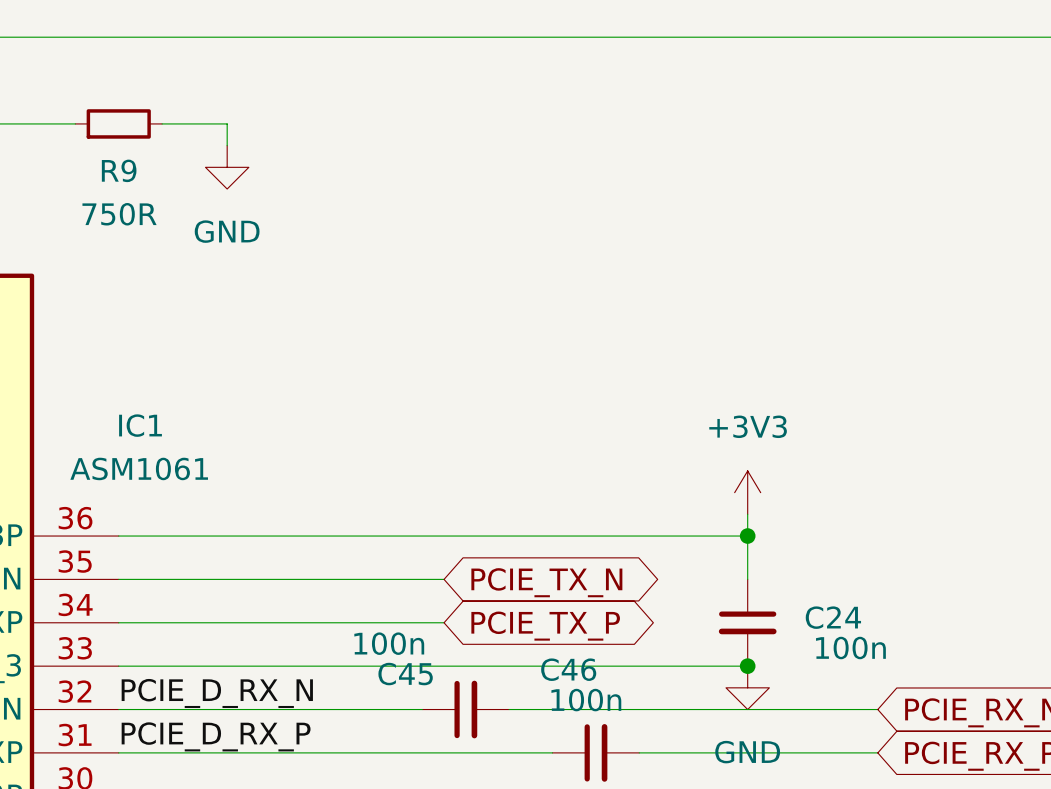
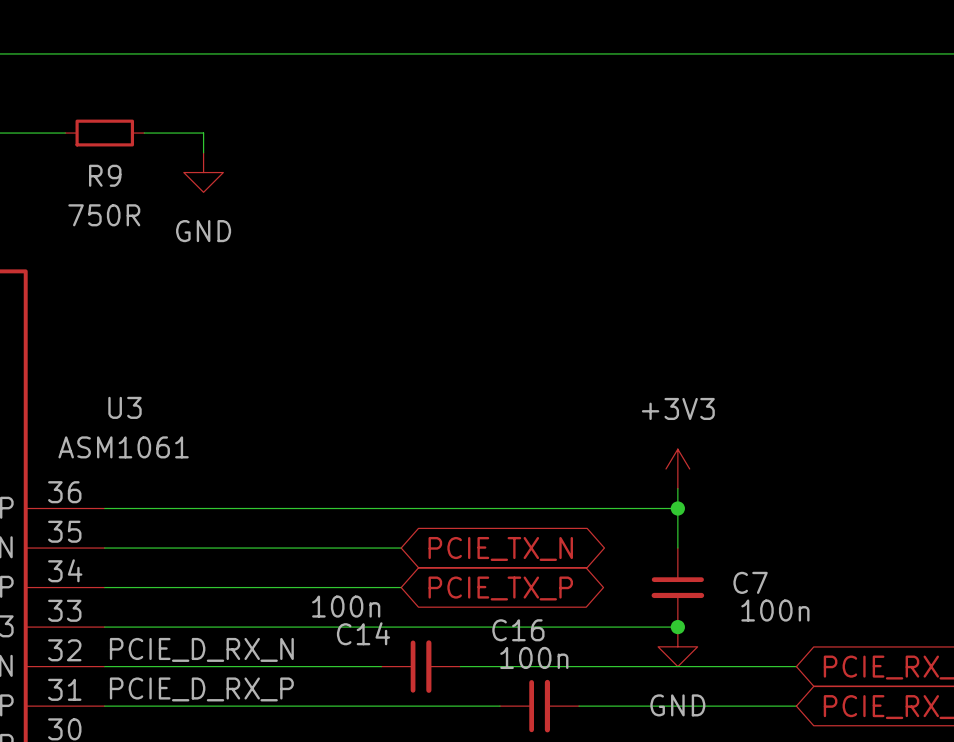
IC1 name: IC1 (140, 425) -> U3 (125, 407)
C24 name: C24 (833, 617) -> C7 (750, 582)
C46 name: C46 (568, 669) -> C16 (518, 630)
C45 name: C45 (405, 674) -> C14 (363, 633)

